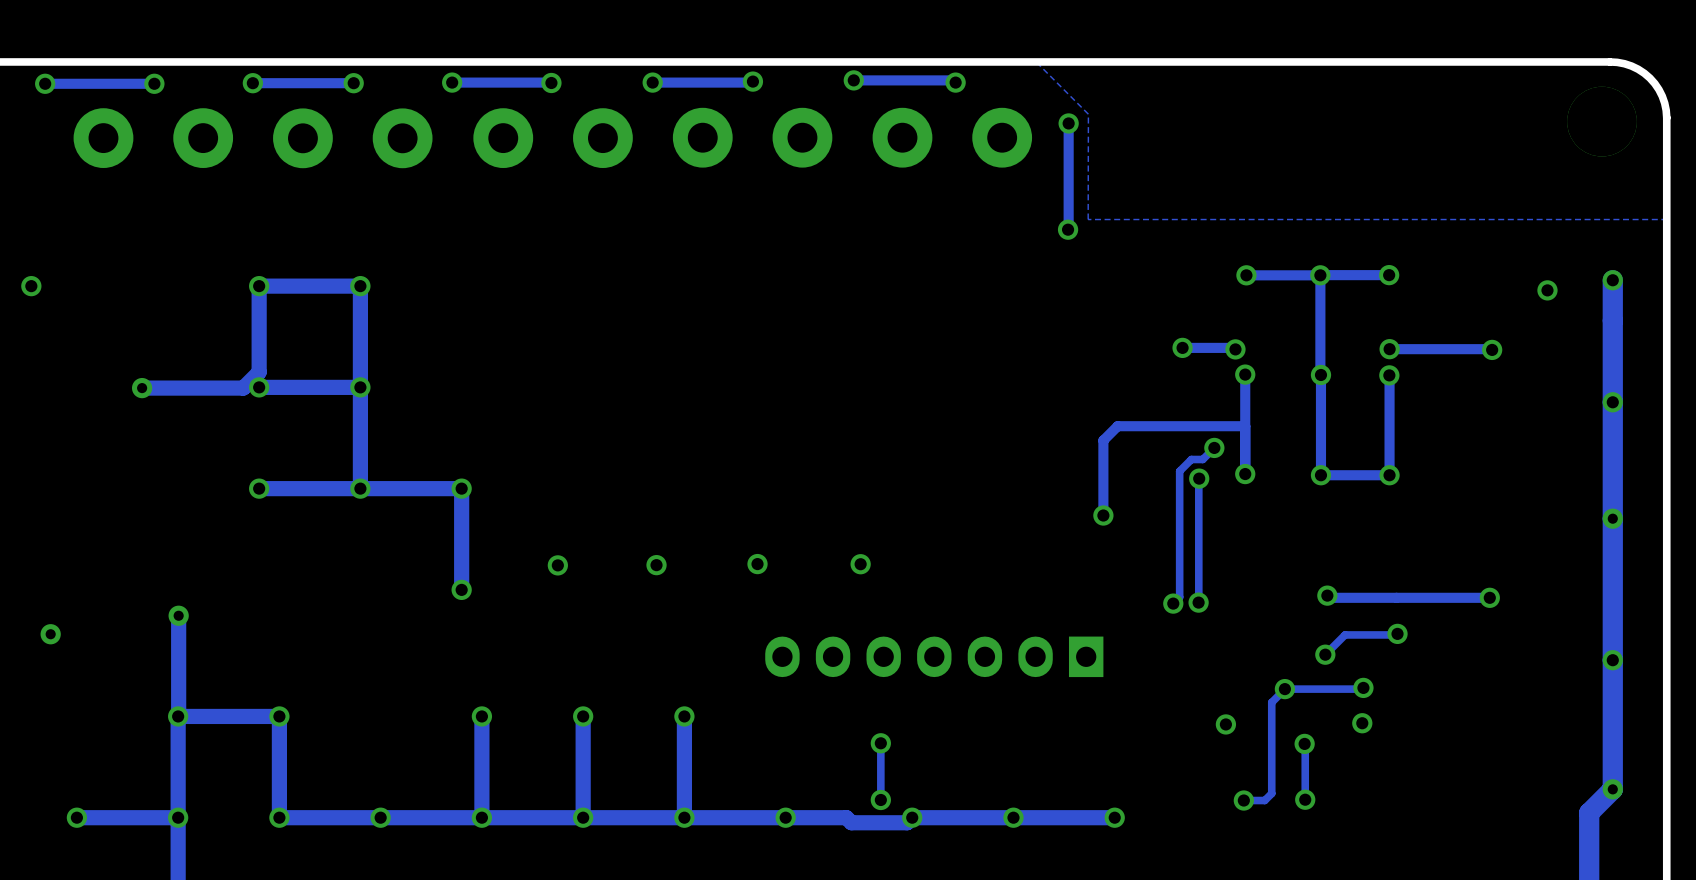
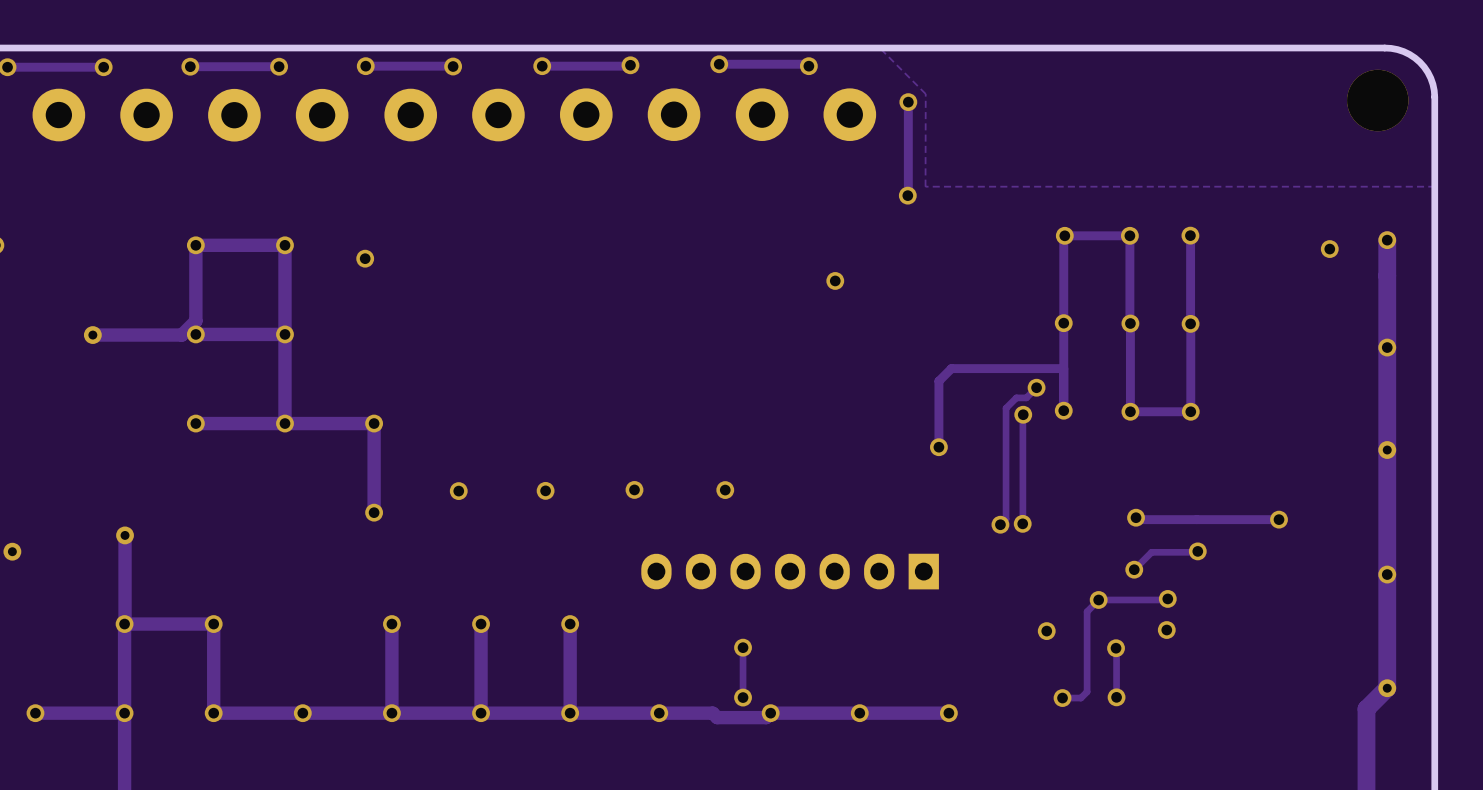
track: (1389, 275) (1320, 275) -> (1190, 235) (1190, 323)
track: none -> (1063, 236) (1063, 323)
via: none -> (365, 258)
via: none -> (835, 280)
track: (1182, 347) (1235, 349) -> none
via: (1182, 347) -> none
via: (1235, 349) -> none
track: (1389, 349) (1492, 349) -> none
via: (1389, 349) -> none
via: (1492, 349) -> none

